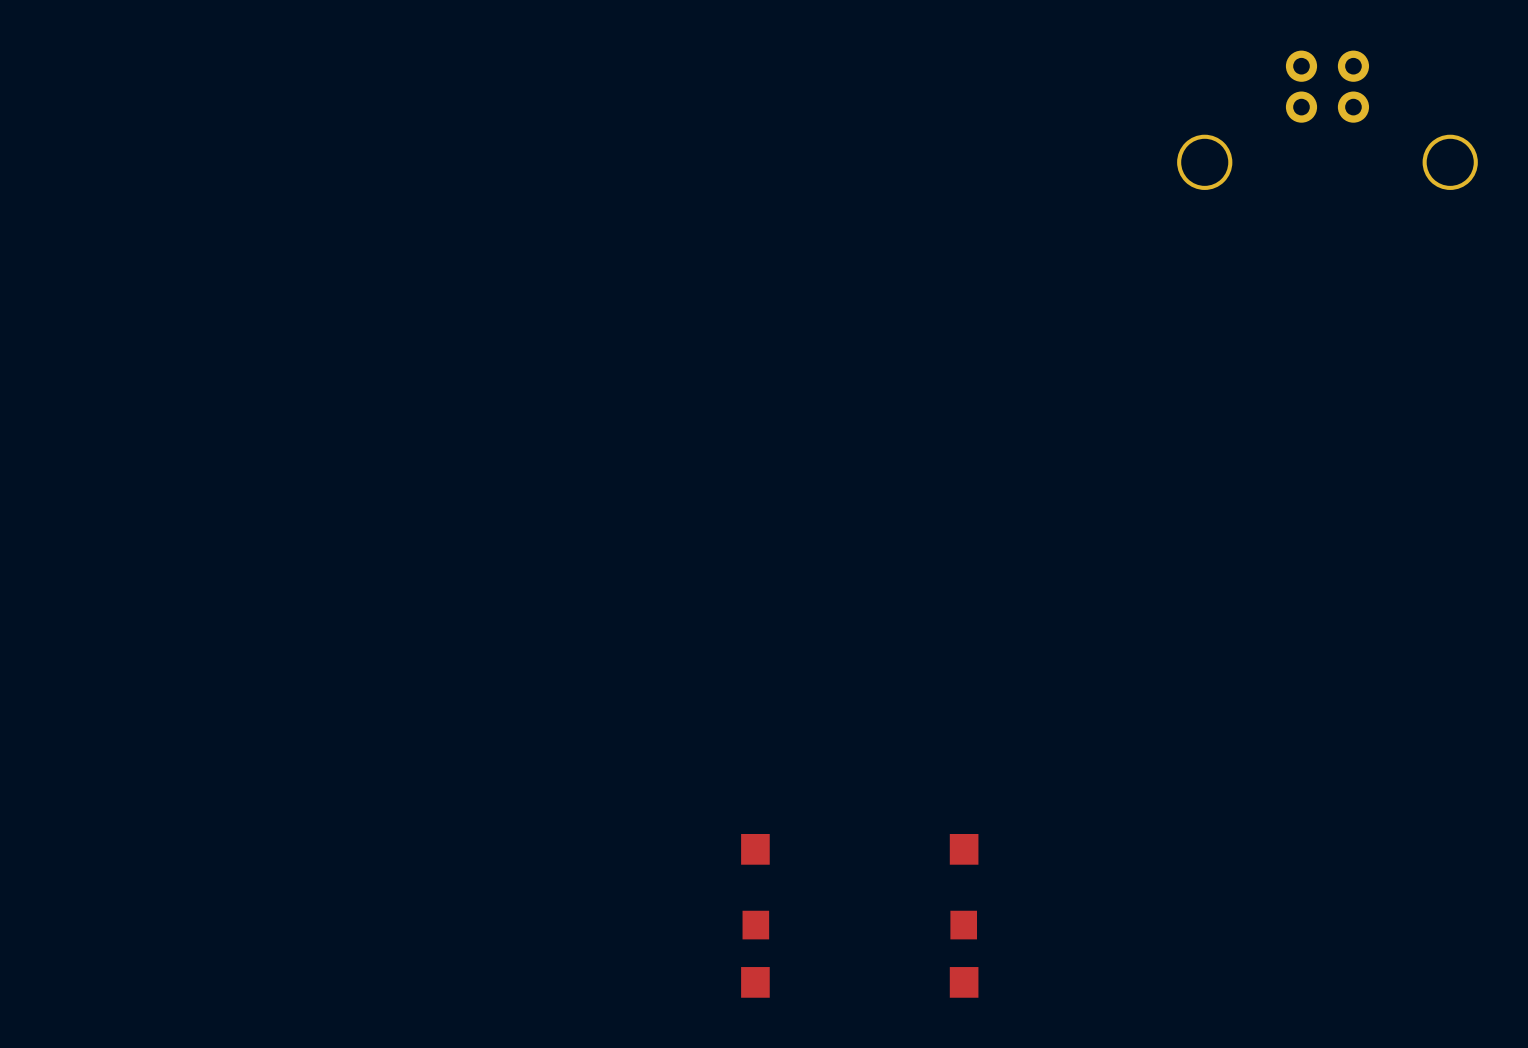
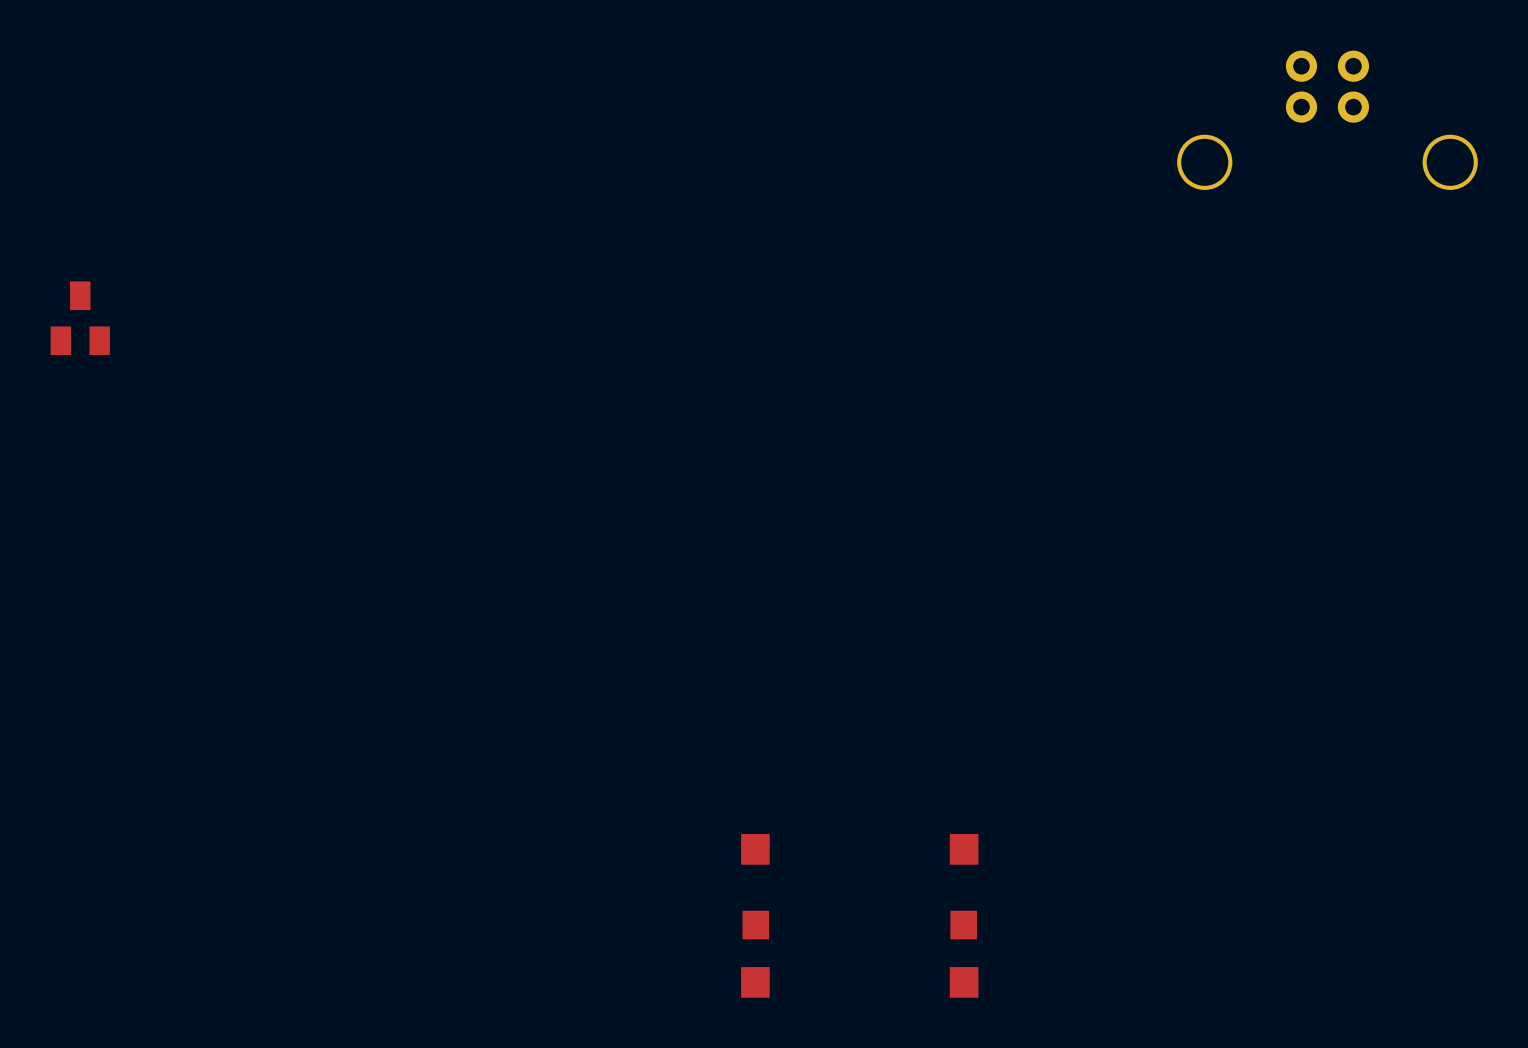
part: none -> (80, 318)

